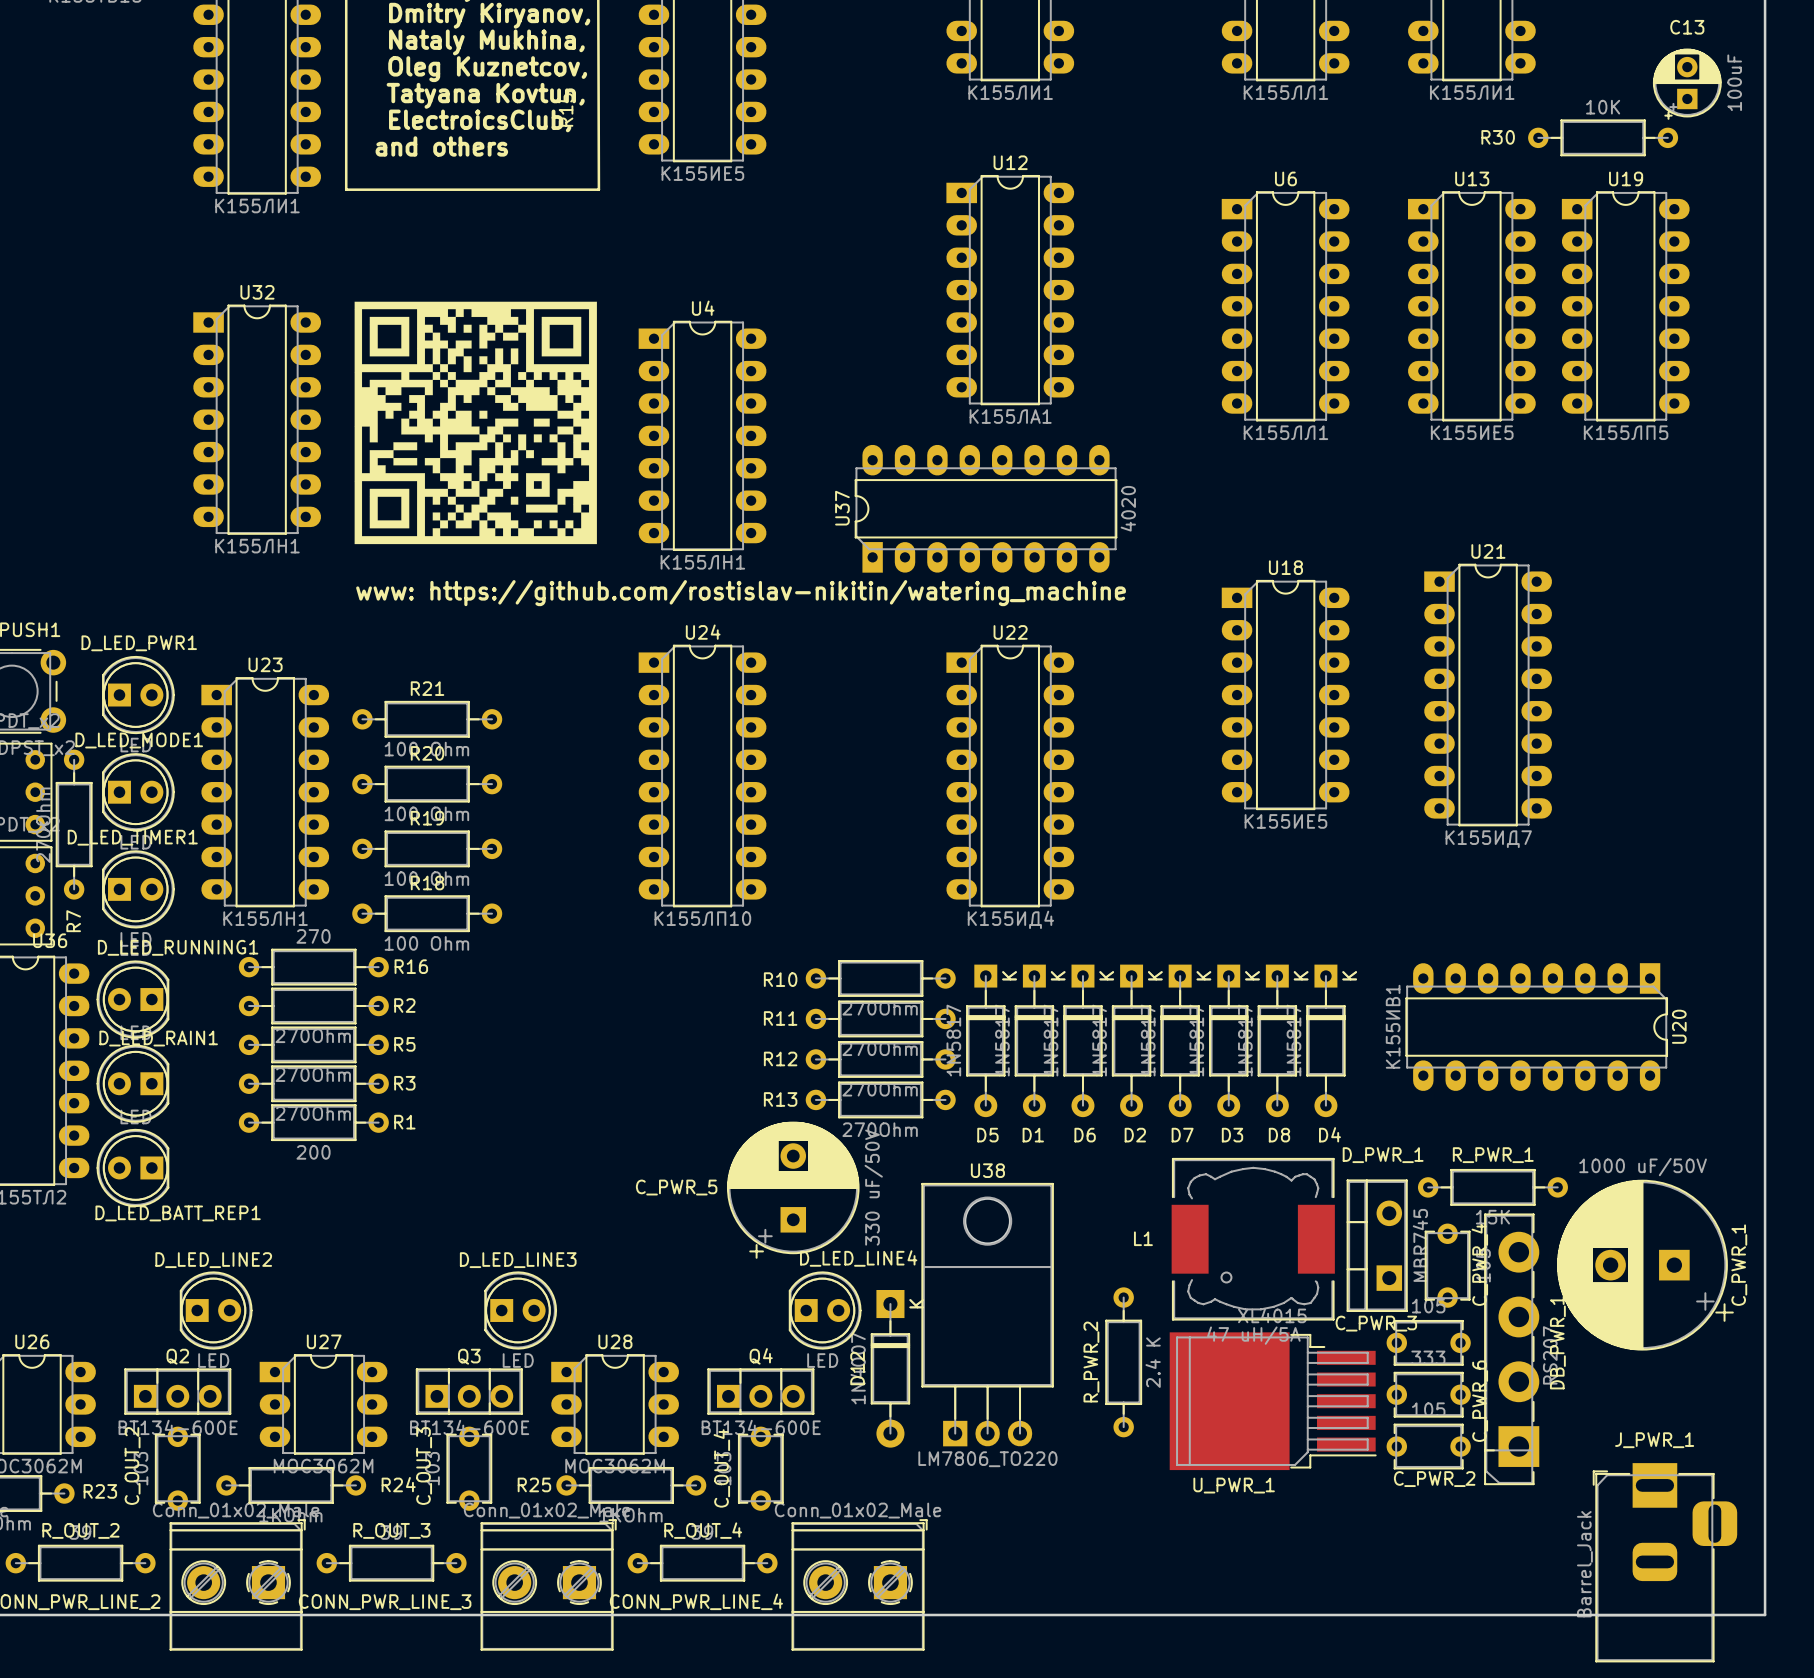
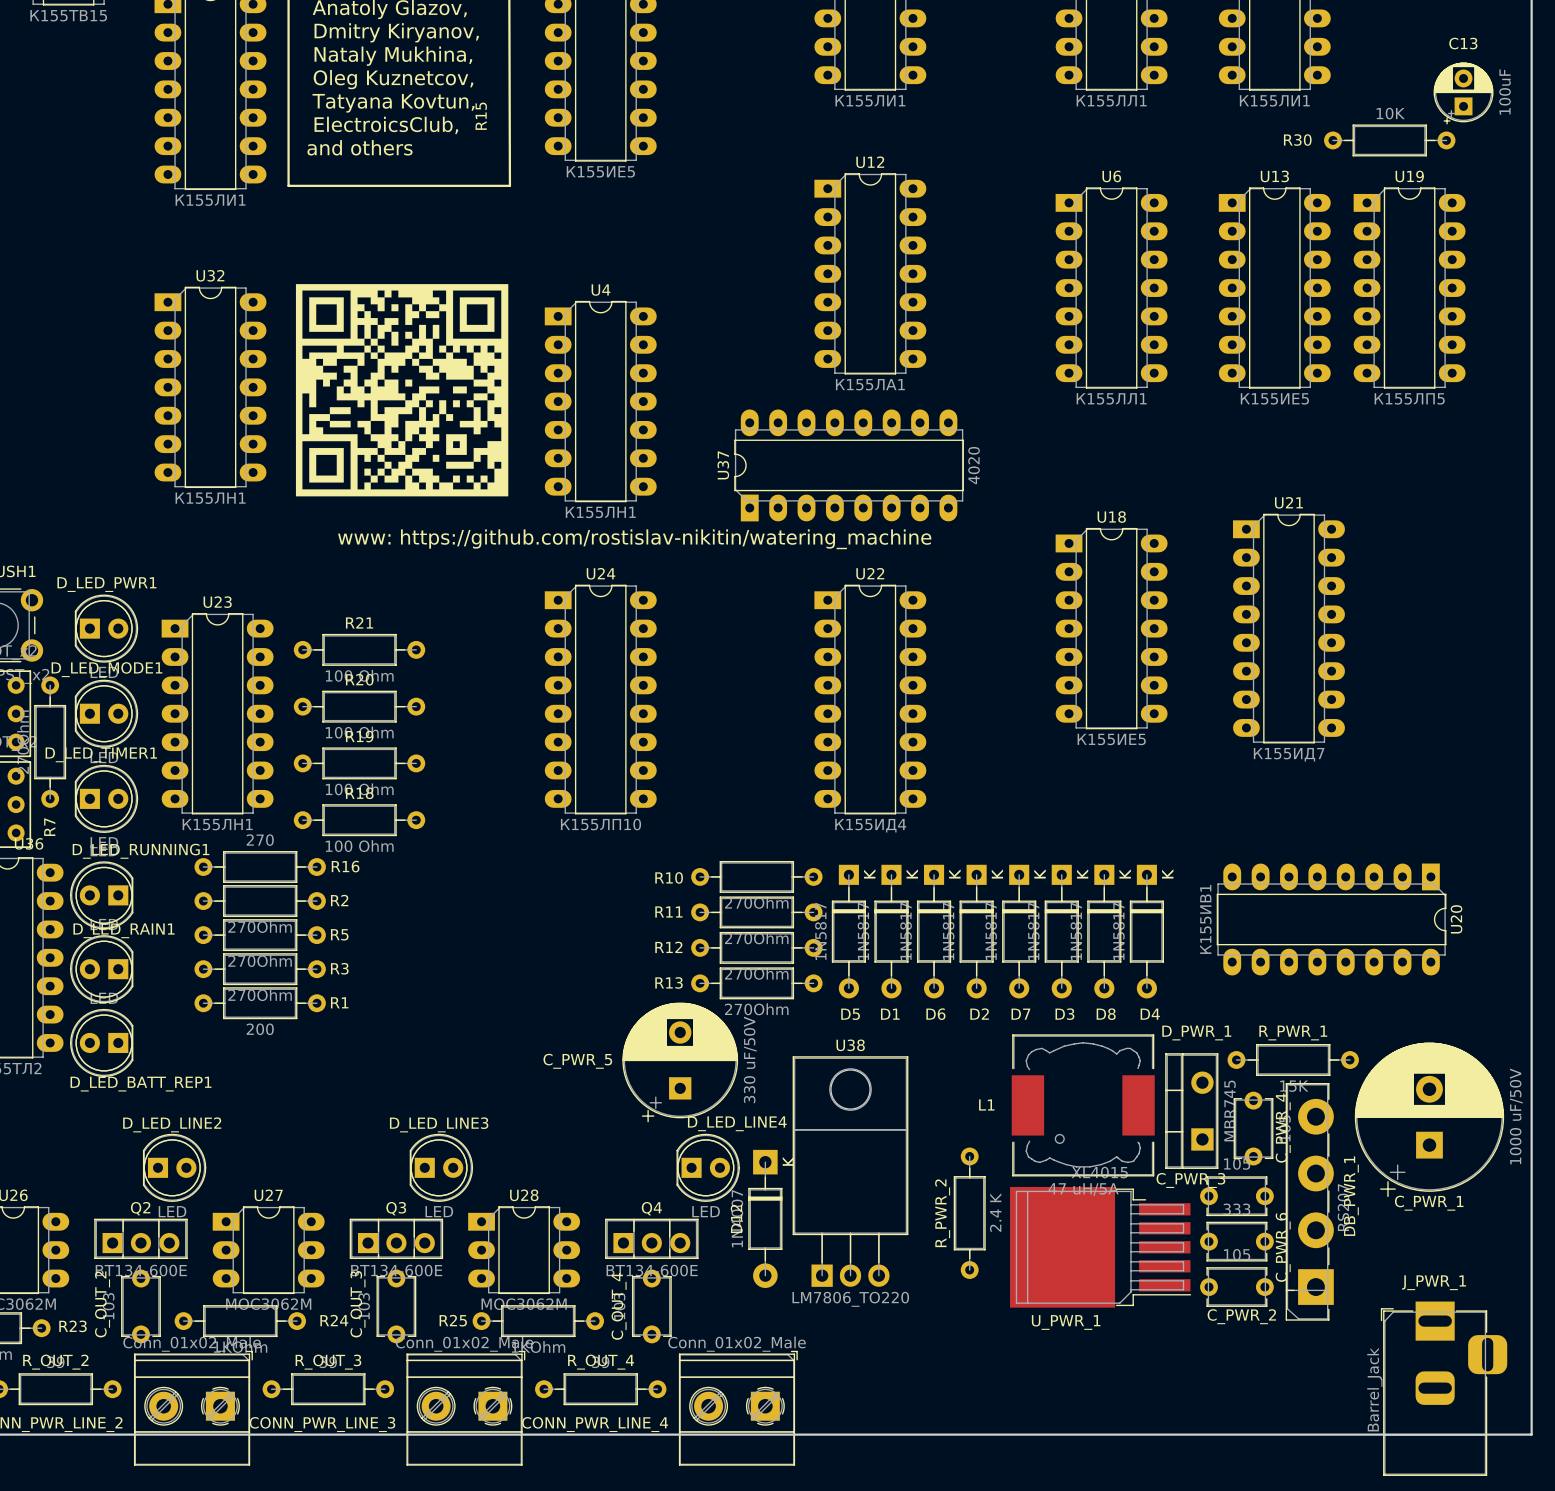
C_PWR_1 rotation: 0° (1645, 1265) -> 90° clockwise (1429, 1119)

